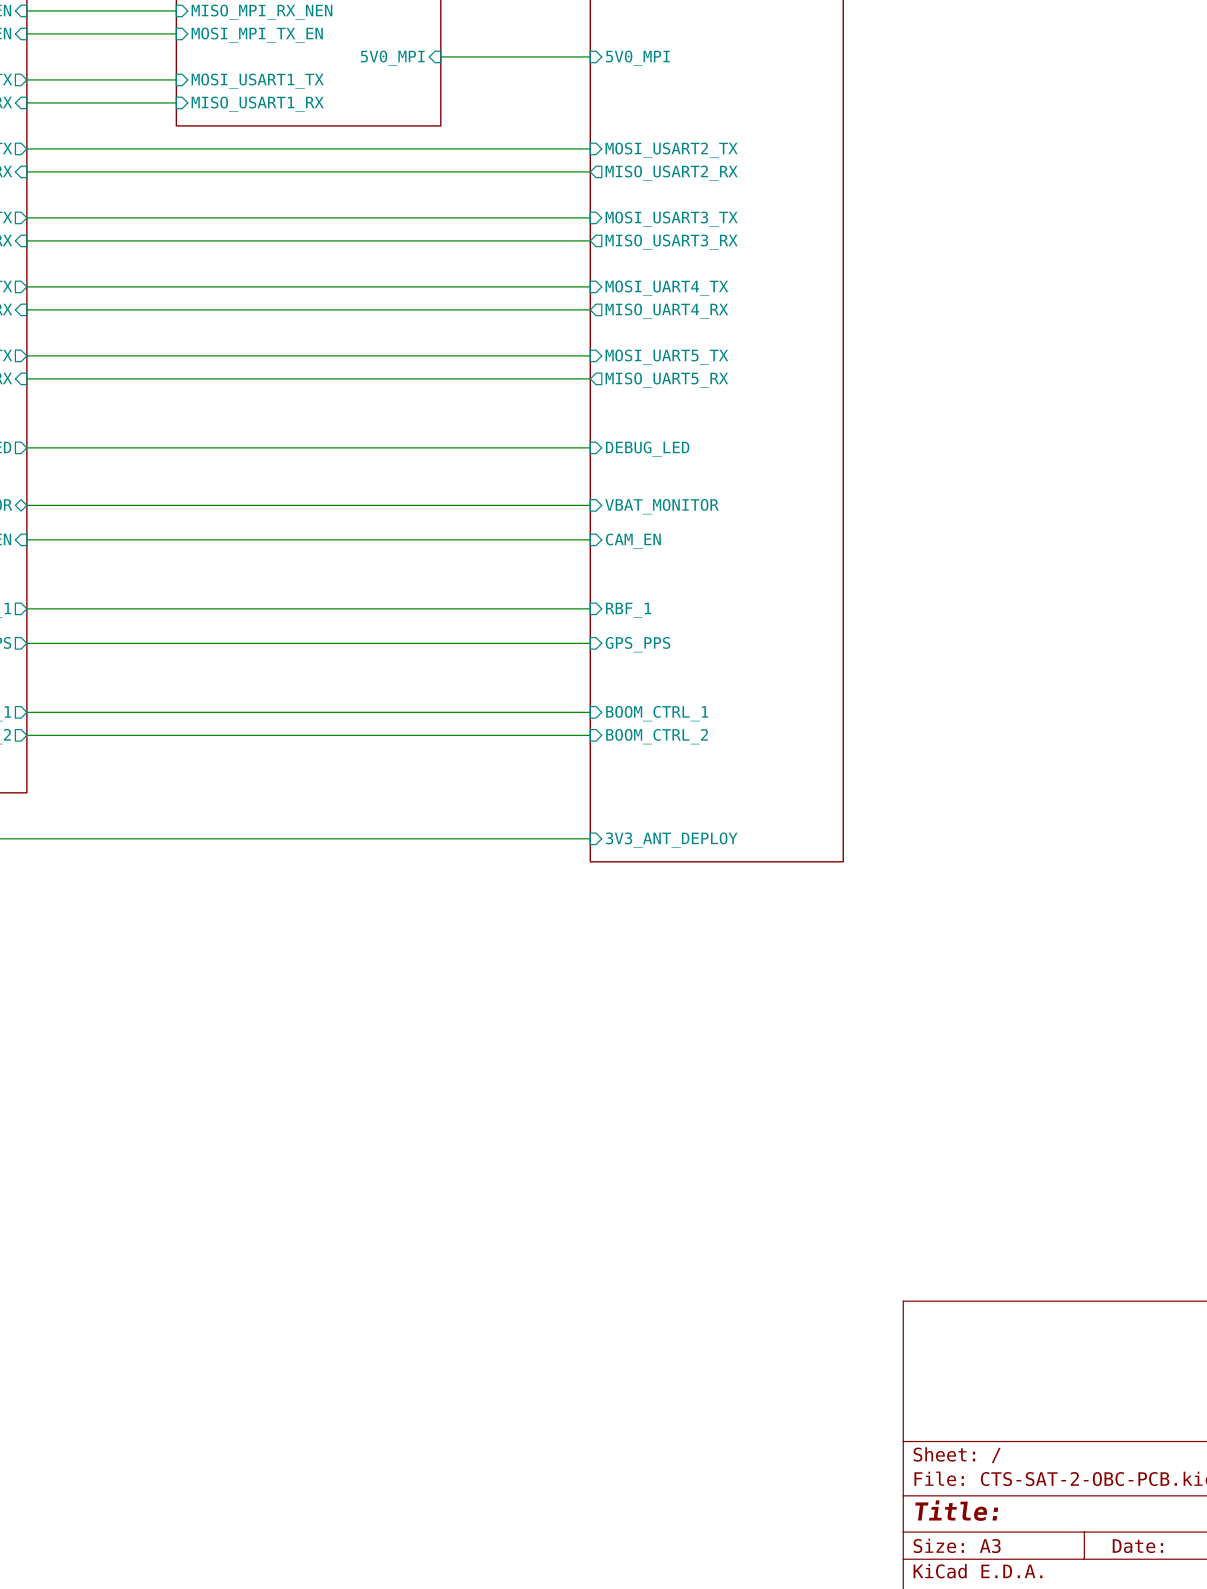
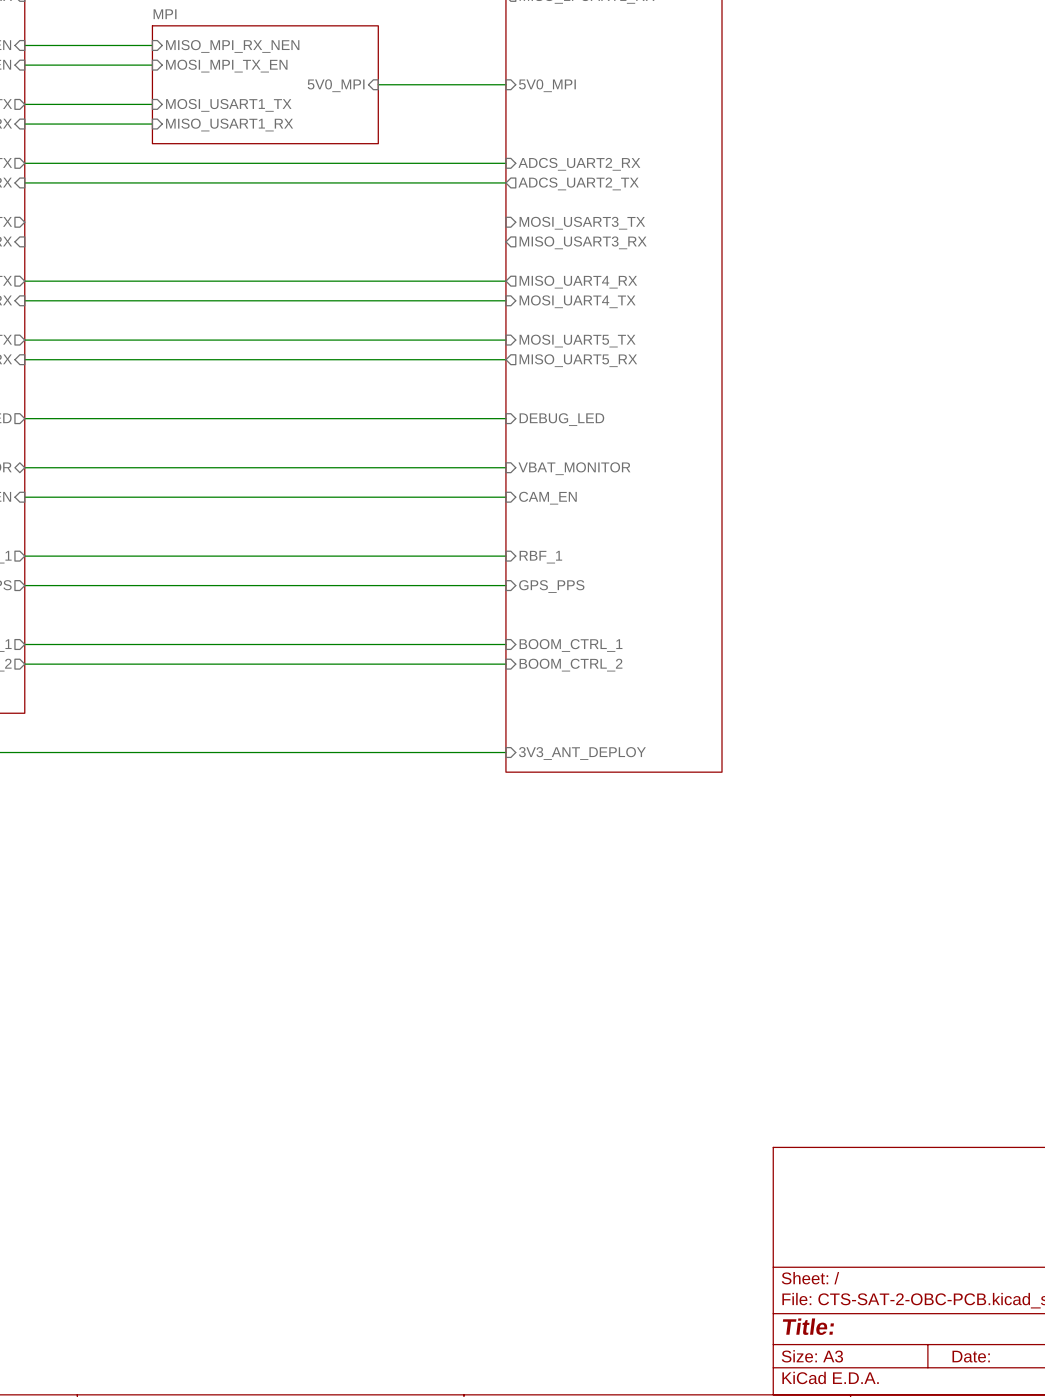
sheet pin: MOSI_USART2_TX (671, 150) -> ADCS_UART2_RX (579, 164)
sheet pin: MISO_USART2_RX (671, 173) -> ADCS_UART2_TX (578, 183)
wire: (26, 217) (590, 217) -> none
wire: (26, 240) (590, 240) -> none
sheet pin shape: input (666, 288) -> output (578, 282)
sheet pin: MOSI_UART4_TX (666, 288) -> MISO_UART4_RX (578, 282)
sheet pin shape: output (666, 311) -> input (577, 301)
sheet pin: MISO_UART4_RX (666, 311) -> MOSI_UART4_TX (577, 301)

